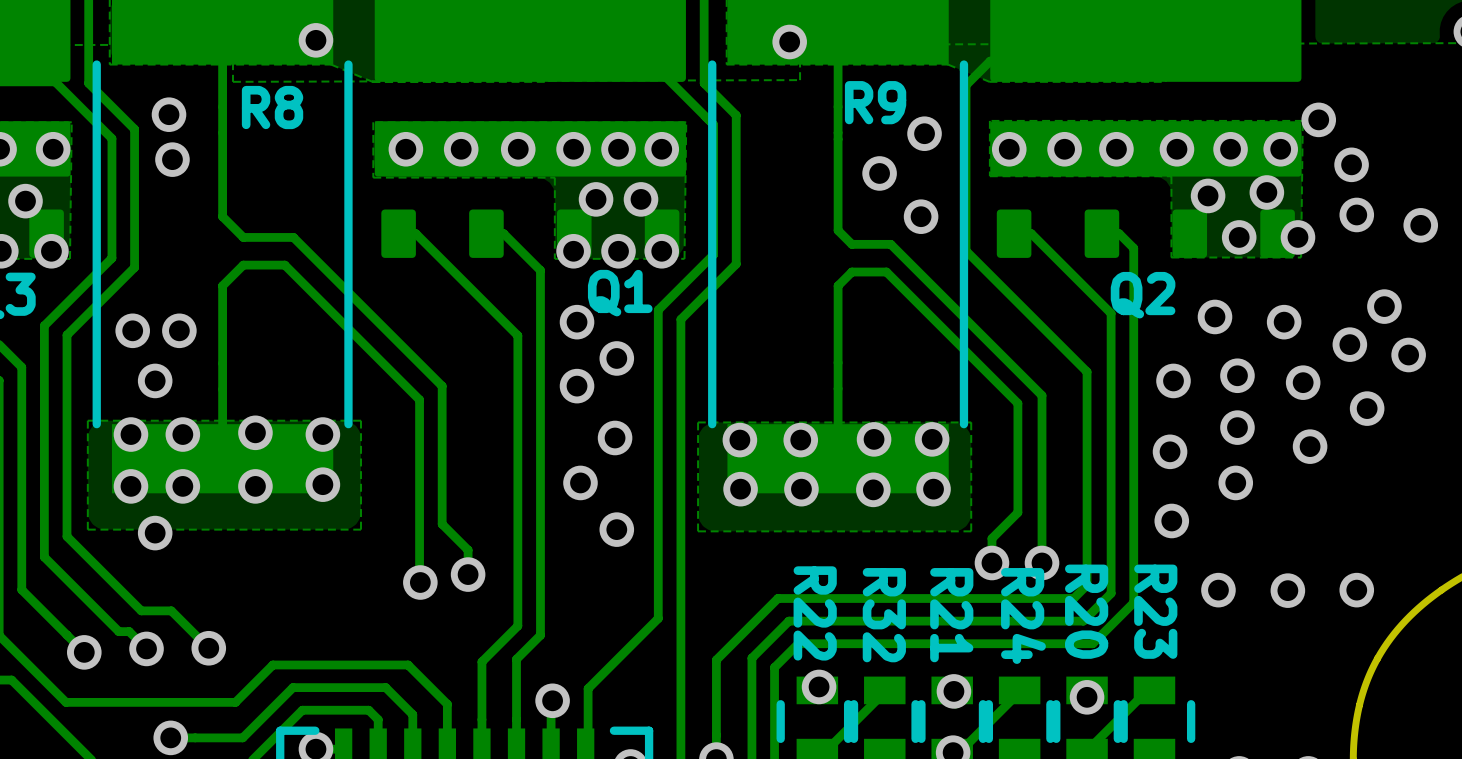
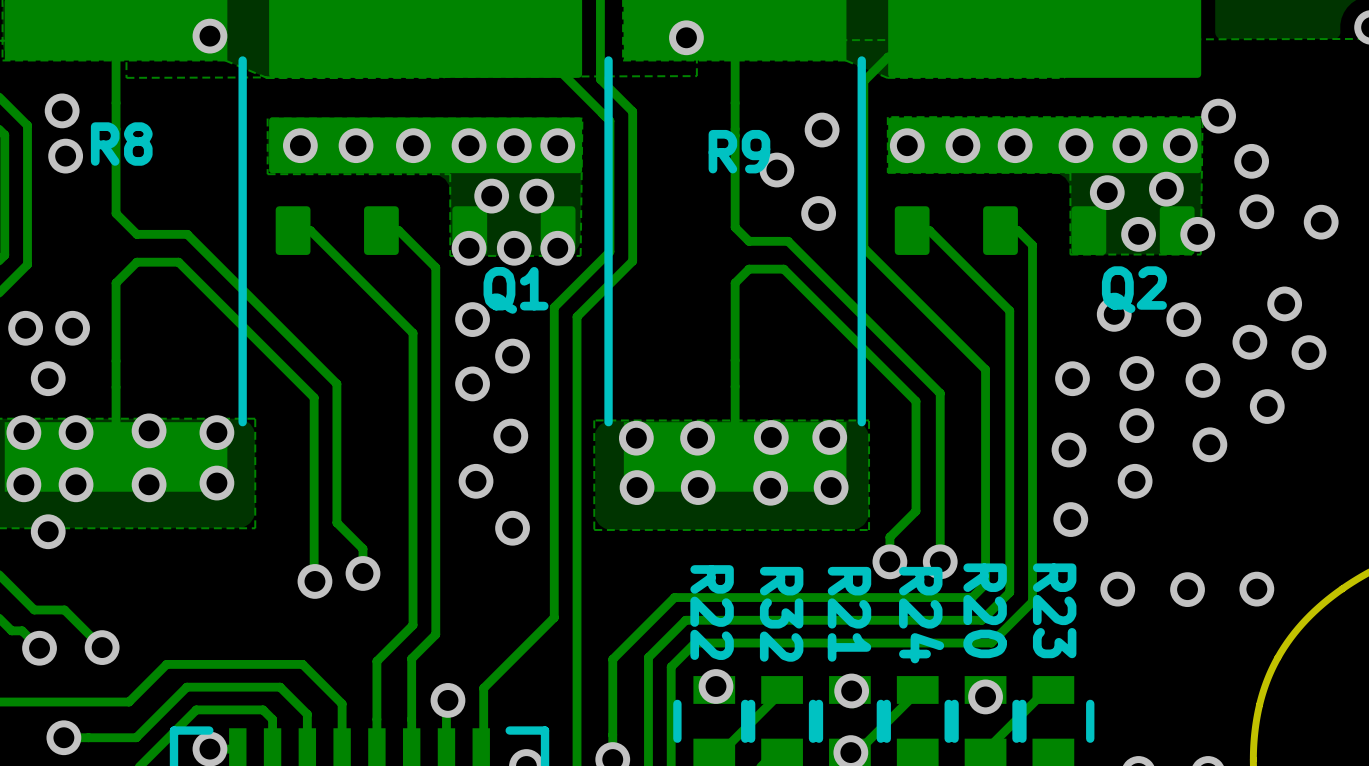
R9 name position: R9 (875, 102) -> R9 (739, 151)
R8 name position: R8 (272, 107) -> R8 (121, 144)
Q2 name position: Q2 (1143, 295) -> Q2 (1134, 289)

